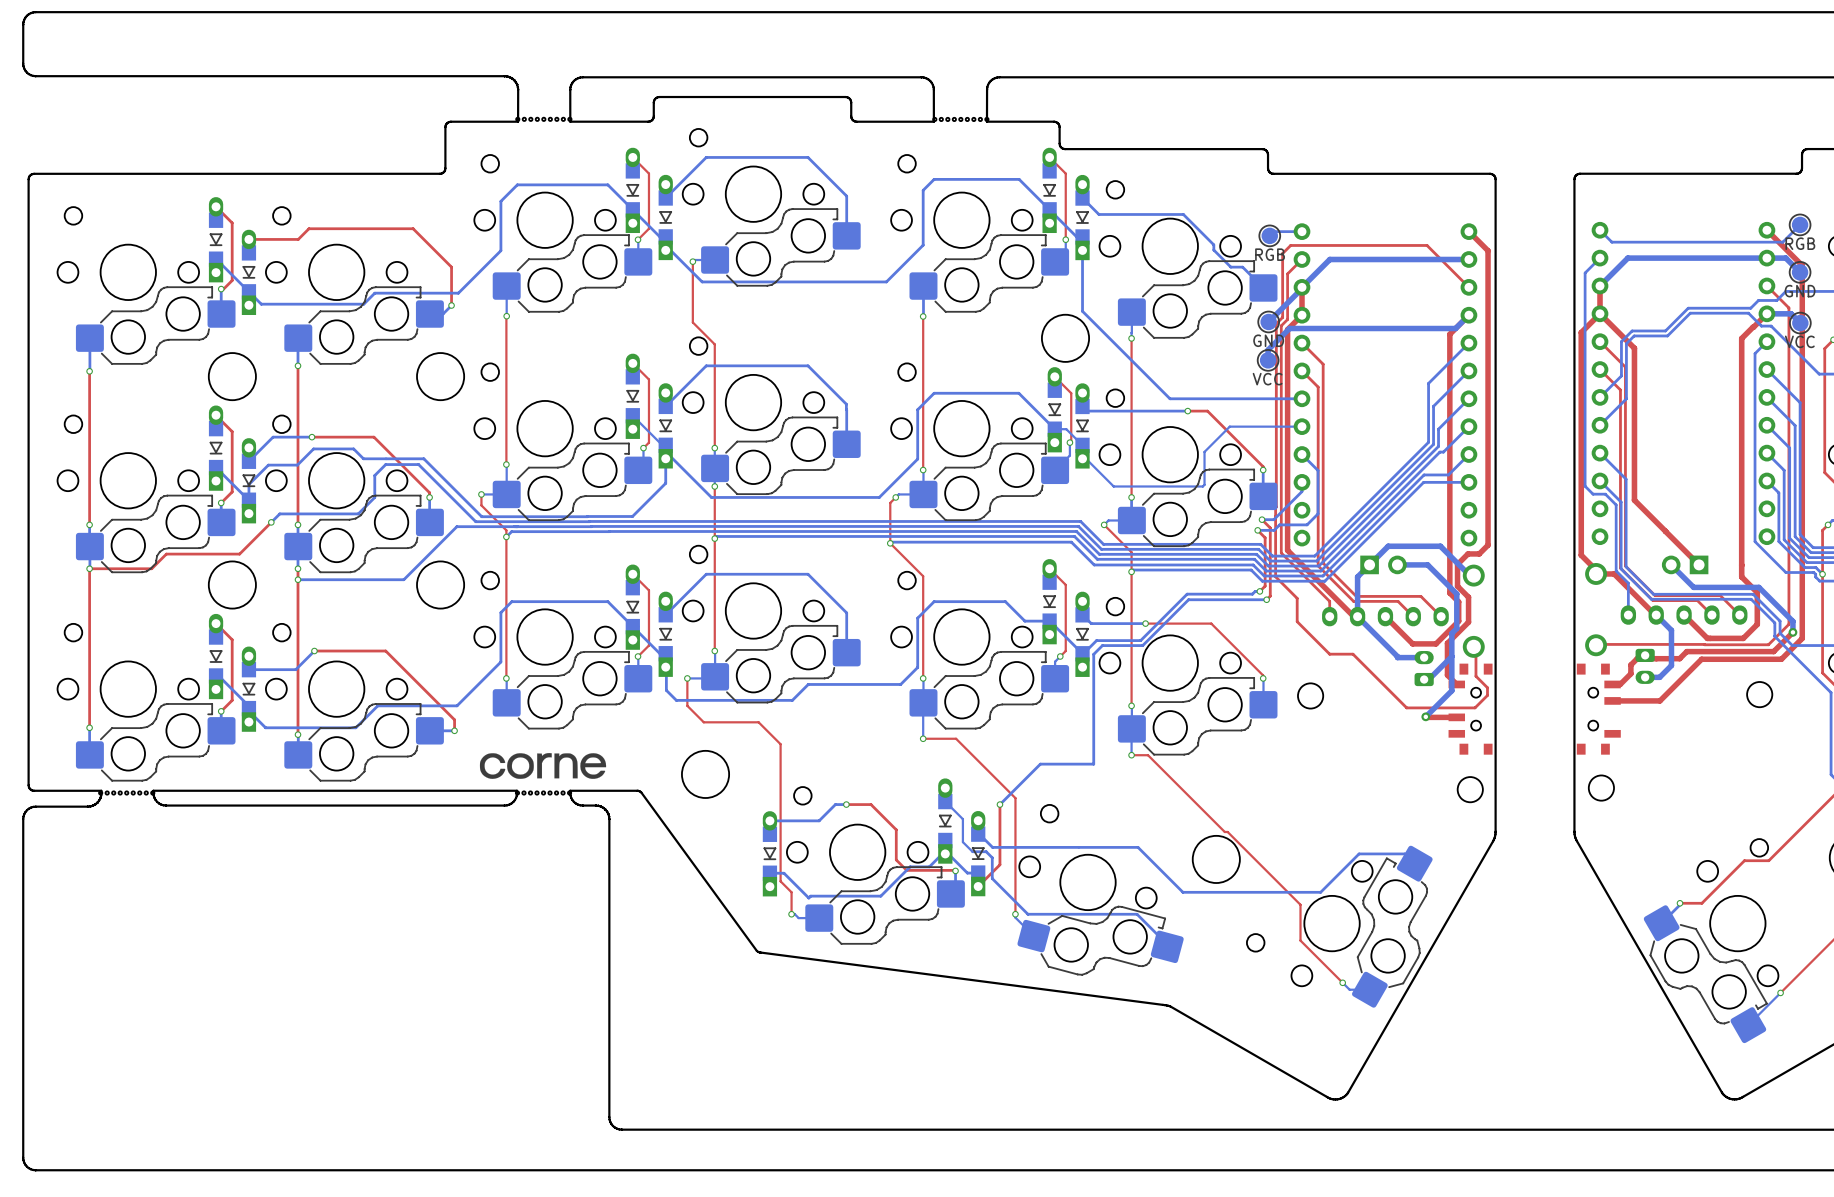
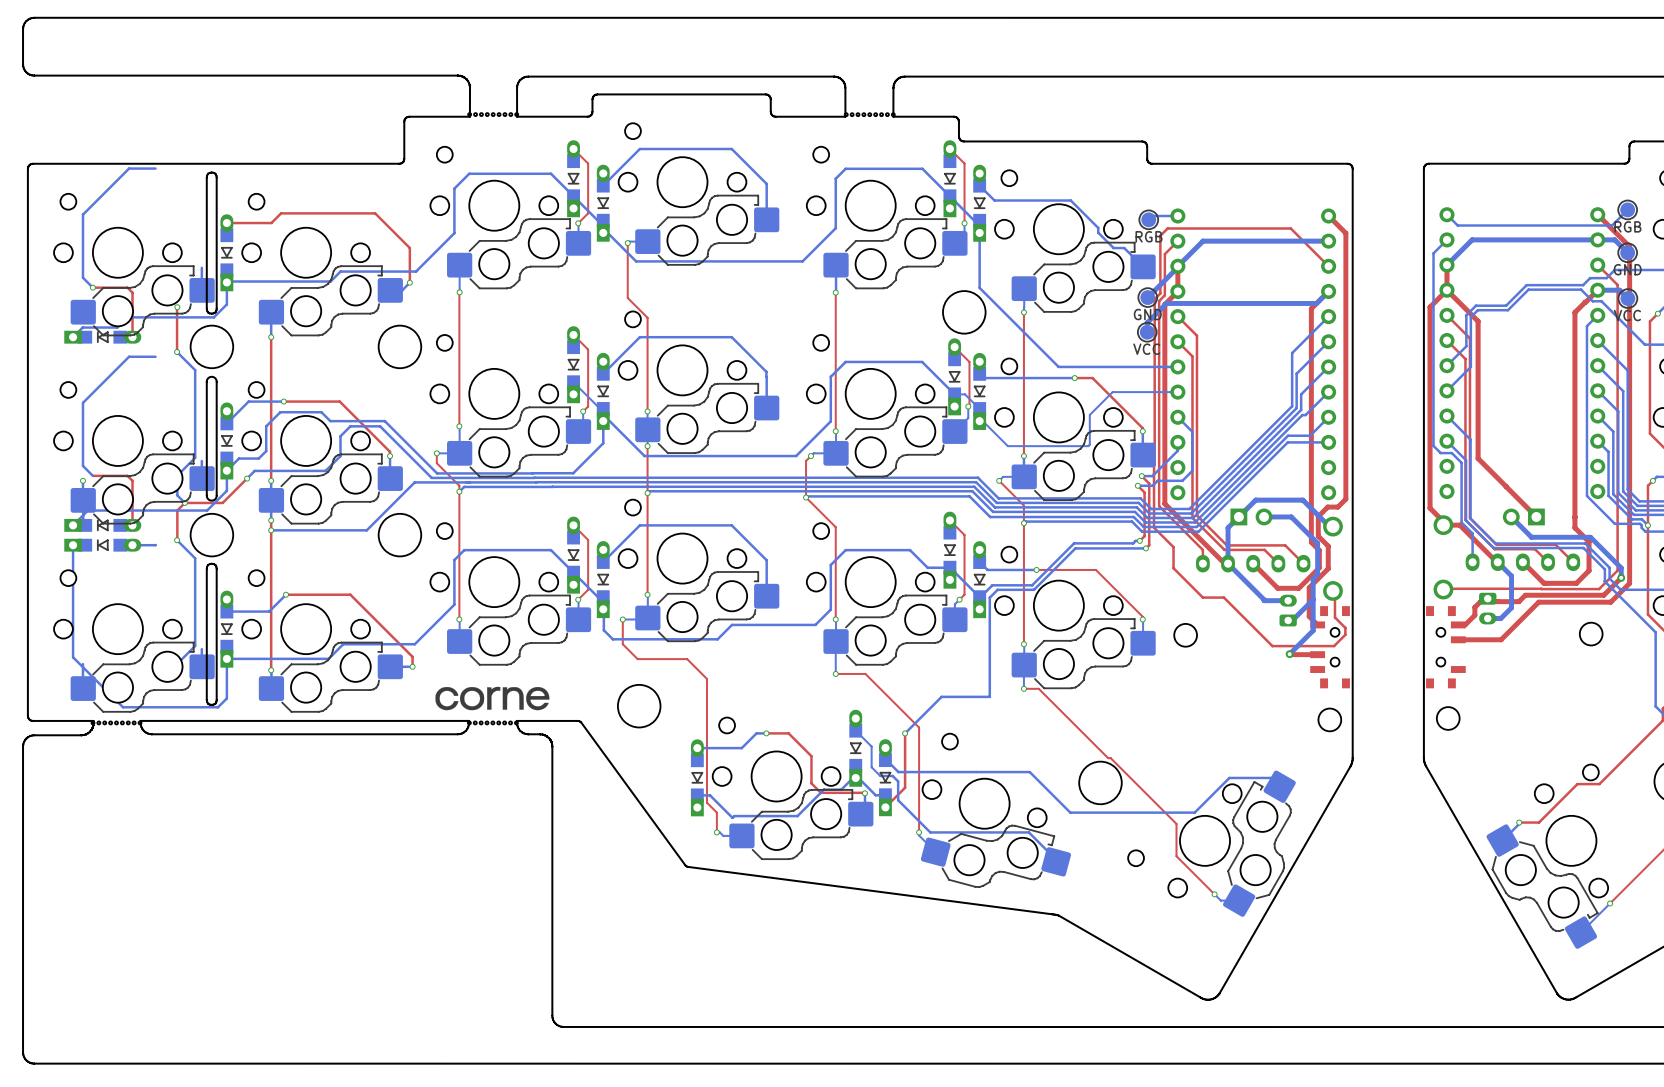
bottom track: none -> (155, 168) (129, 168) (82, 214) (82, 277) (92, 287)
board edge: none -> (211, 172) (215, 173) (216, 177) (216, 308) (215, 312) (211, 313) (208, 312) (206, 308) (206, 177) (208, 173) (211, 172)
top track: (216, 206) (232, 222) (232, 280) (221, 289) -> none
part: (216, 239) -> none
bottom track: (216, 259) (261, 304) -> (73, 337) (82, 327) (117, 327) (127, 317) (213, 317) (226, 304) (226, 282) (238, 281)
via: (221, 289) -> none
top track: none -> (92, 287) (127, 287) (132, 292) (132, 337)
via: none -> (92, 287)
top track: none -> (177, 307) (177, 352)
via: none -> (177, 307)
bottom track: (89, 338) (89, 371) -> none
part: none -> (102, 337)
top track: (89, 371) (89, 524) -> none
via: (89, 371) -> none
bottom track: none -> (177, 352) (195, 370) (195, 457) (177, 475) (177, 495) (184, 502)
via: none -> (177, 352)
bottom track: none -> (155, 356) (129, 356) (82, 402) (82, 465) (92, 475)
top track: (216, 415) (232, 431) (232, 491) (221, 502) -> none
board edge: none -> (216, 381) (216, 495) (211, 500) (206, 495) (206, 381) (211, 376) (216, 381)
part: (216, 448) -> none
bottom track: (313, 448) (297, 465) (268, 465) (248, 484) (248, 500) -> (285, 412) (280, 412) (266, 426) (266, 451) (258, 458) (239, 458) (226, 470) (226, 490) (207, 510) (87, 510) (73, 525)
bottom track: (216, 467) (248, 500) -> none
via: (221, 502) -> none
top track: none -> (92, 475) (127, 475) (132, 480) (132, 525)
via: none -> (184, 502)
top track: (244, 549) (239, 554) (166, 554) (151, 568) (89, 568) (89, 727) -> (222, 502) (184, 502) (177, 510) (177, 540)
via: (89, 568) -> none
part: none -> (102, 525)
bottom track: none -> (177, 540) (195, 558) (195, 645) (177, 663)
via: none -> (177, 540)
bottom track: none -> (155, 544) (132, 545)
part: none -> (102, 545)
board edge: none -> (211, 563) (215, 565) (216, 568) (216, 699) (215, 703) (211, 704) (208, 703) (206, 699) (206, 568) (208, 565) (211, 563)
top track: (216, 623) (232, 639) (232, 700) (221, 711) -> none
part: (216, 656) -> none
bottom track: (216, 675) (216, 673) (248, 706) -> none
bottom track: (247, 709) (265, 727) (355, 727) (361, 722) -> (73, 545) (73, 657) (123, 707) (218, 707) (226, 698) (226, 658) (328, 658)
via: (221, 711) -> none
via: (89, 727) -> none

